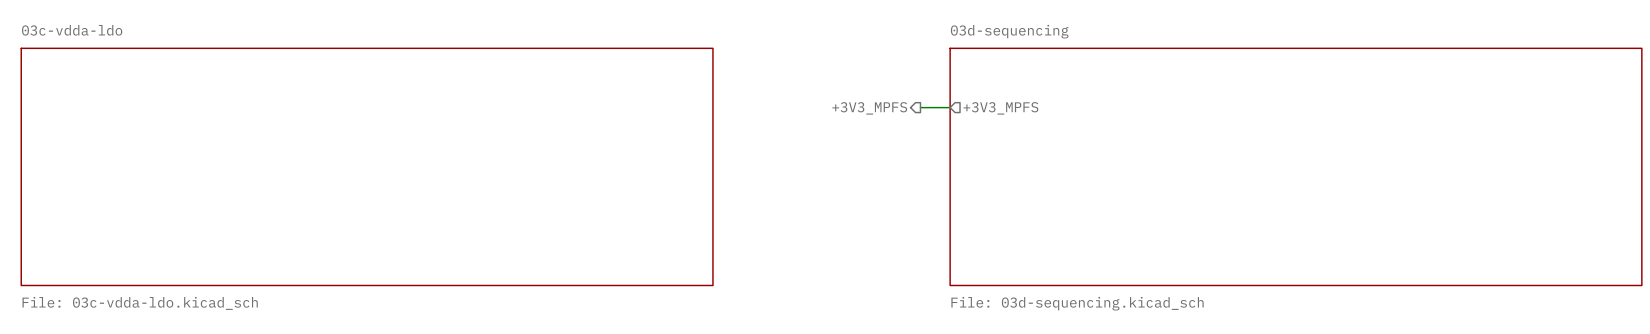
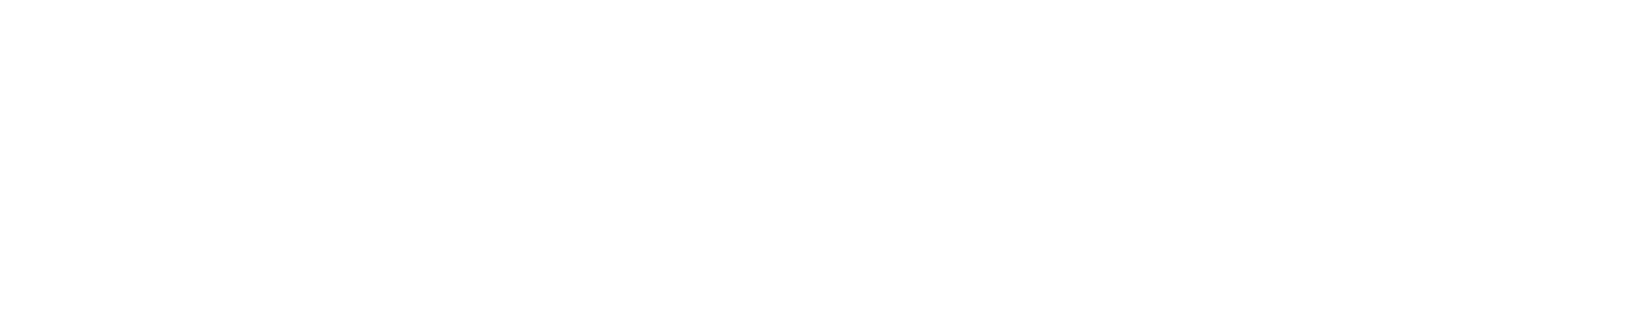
wire: (920, 107) (950, 107) -> none
hierarchical label: +3V3_MPFS (869, 108) -> none
sheet pin: +3V3_MPFS (1000, 108) -> none
sheet 03c-vdda-ldo: File: 03c-vdda-ldo.kicad_sch (367, 166) -> none
sheet 03d-sequencing: File: 03d-sequencing.kicad_sch (1295, 166) -> none

